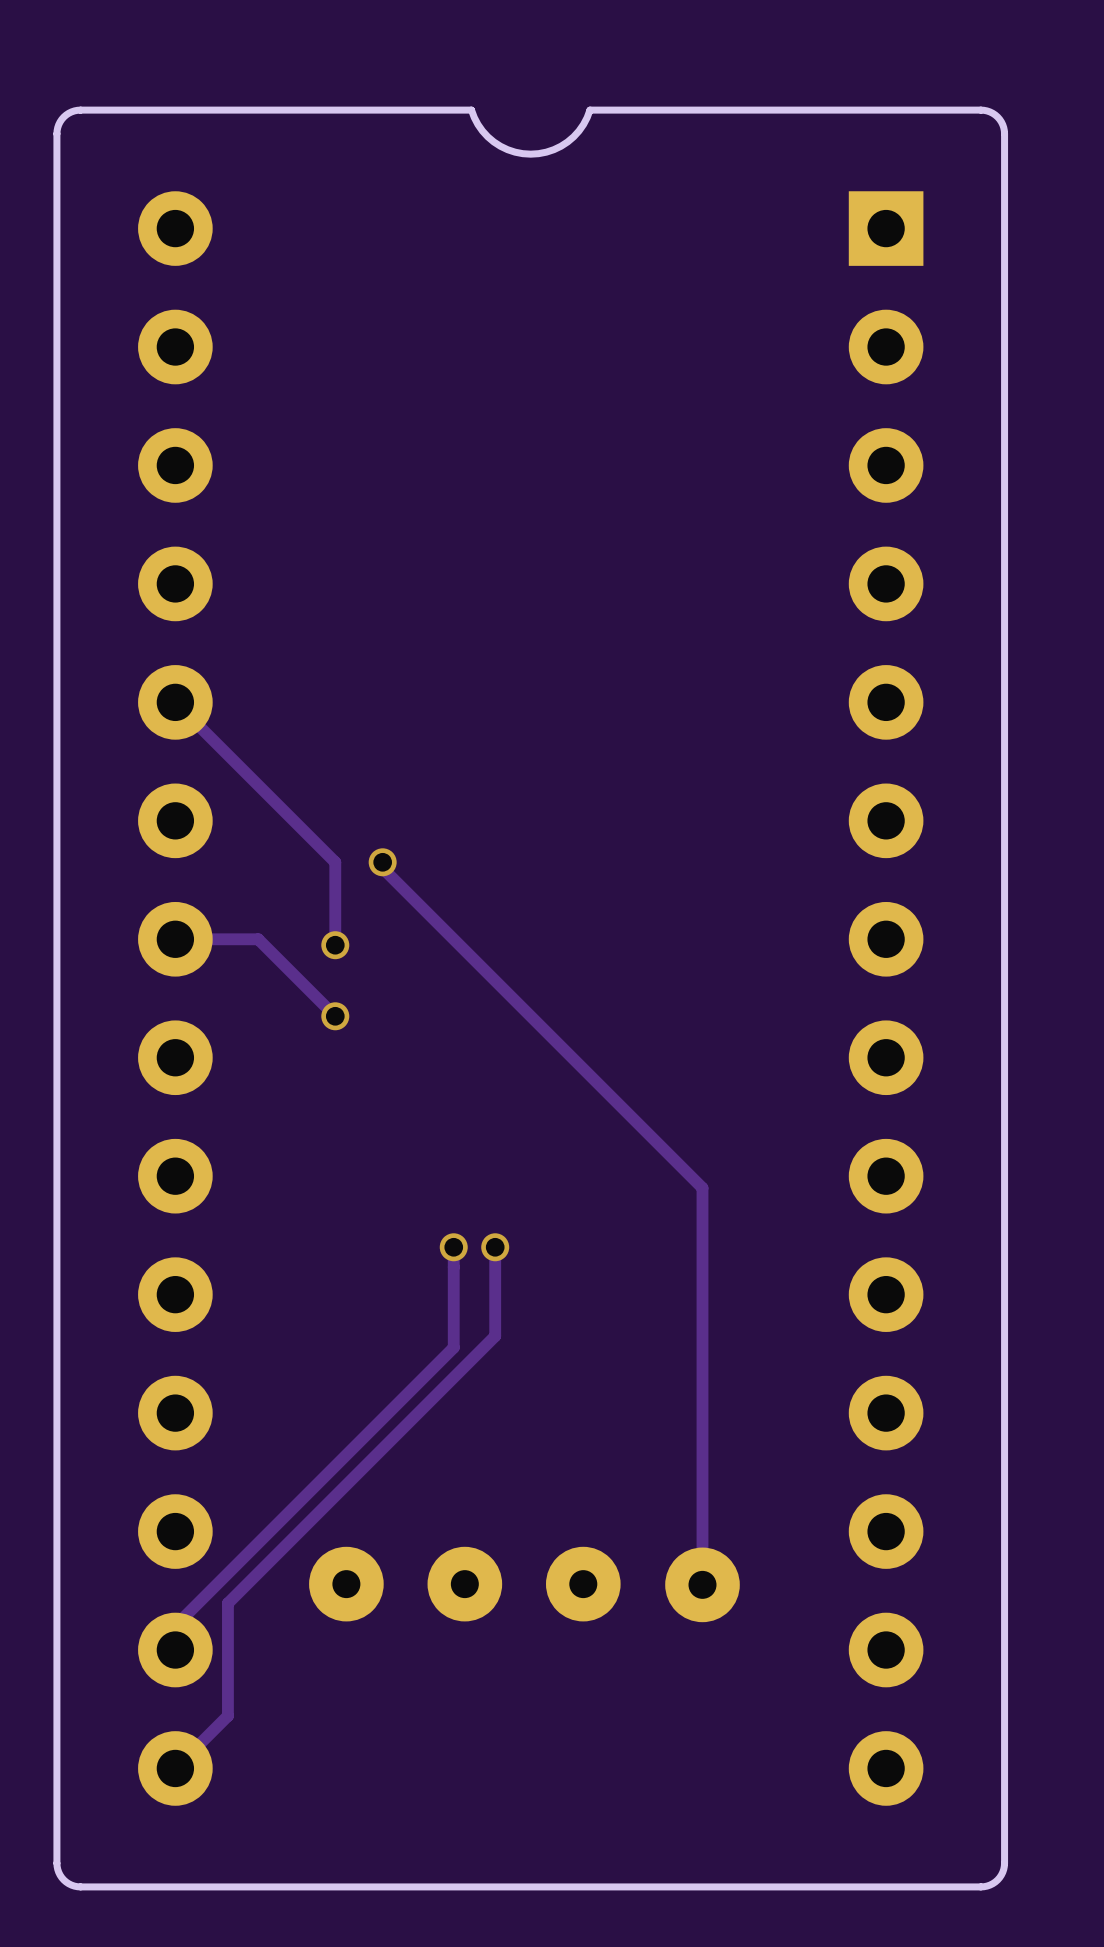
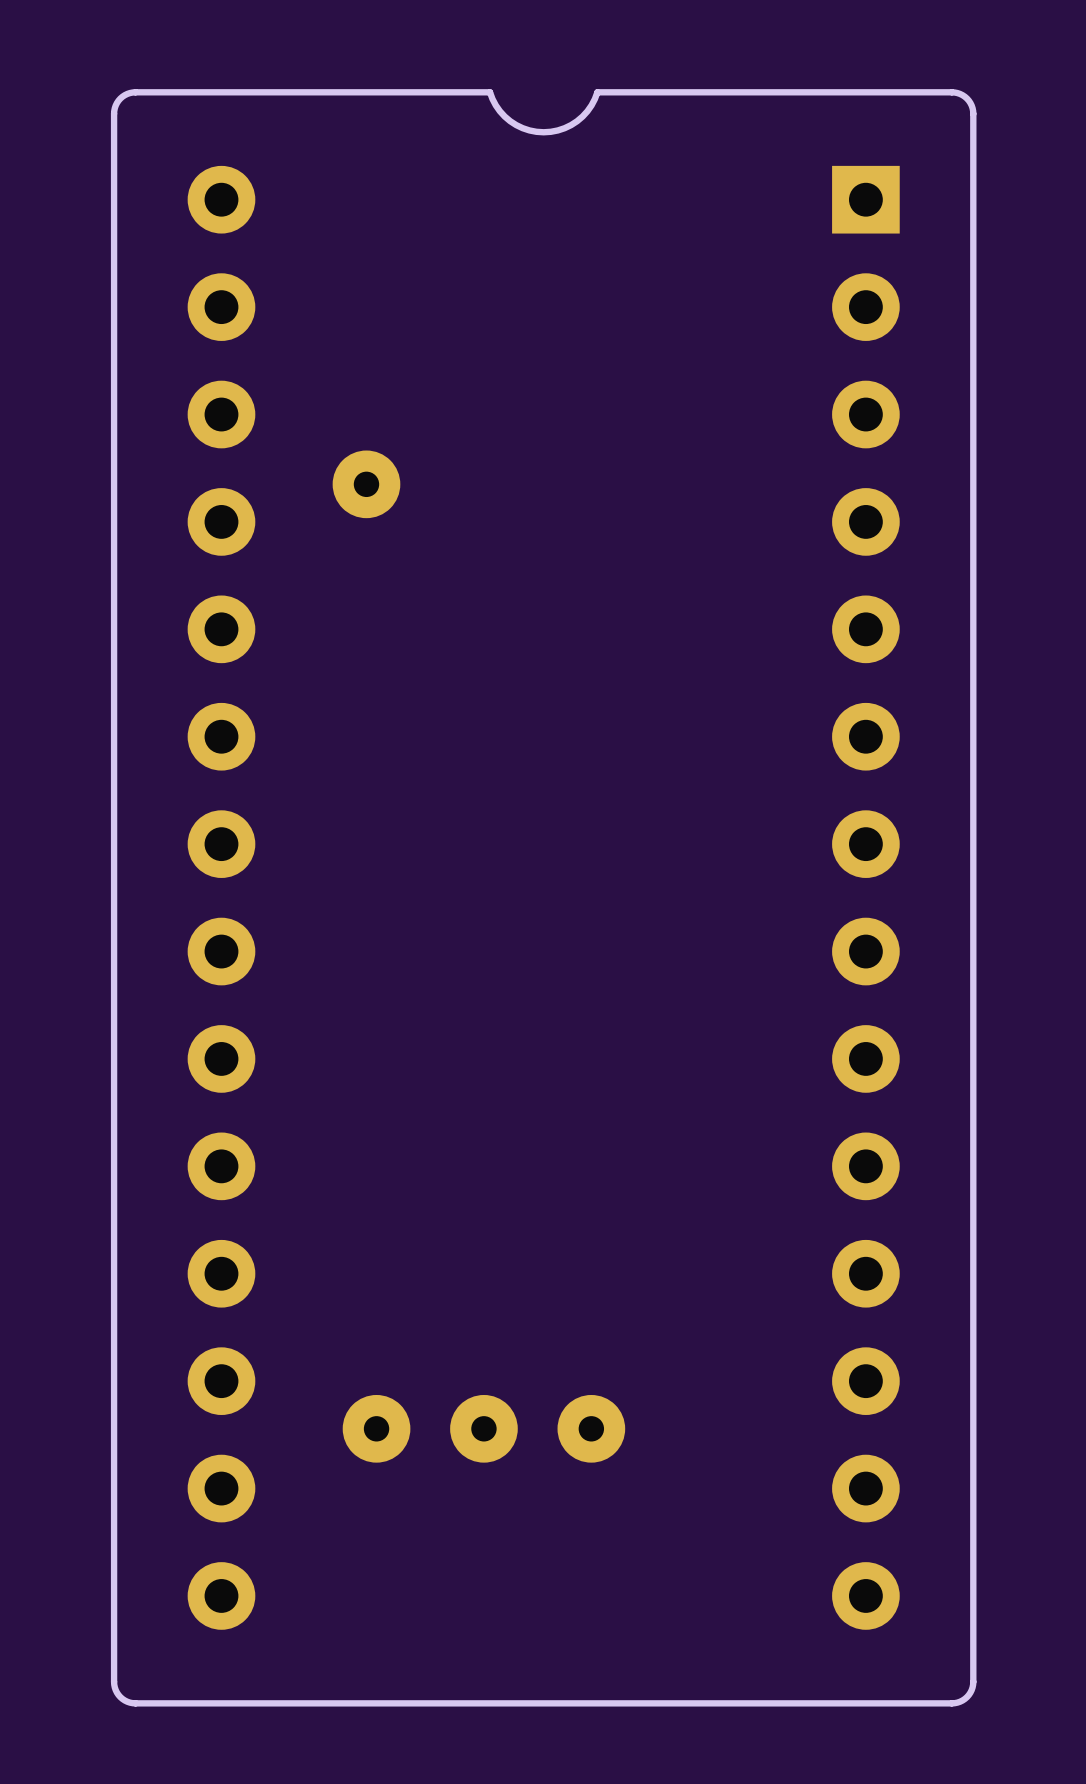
track: (175, 702) (335, 862) (335, 945) -> none
track: (382, 862) (382, 868) (702, 1188) (702, 1584) -> none
via: (382, 862) -> none
track: (175, 939) (258, 939) (335, 1016) -> none
via: (335, 945) -> none
via: (335, 1016) -> none
track: (453, 1247) (453, 1347) (175, 1625) (175, 1650) -> none
via: (453, 1247) -> none
track: (495, 1247) (495, 1336) (227, 1603) (227, 1715) (175, 1768) -> none
via: (495, 1247) -> none
part position: (702, 1584) -> (366, 484)

